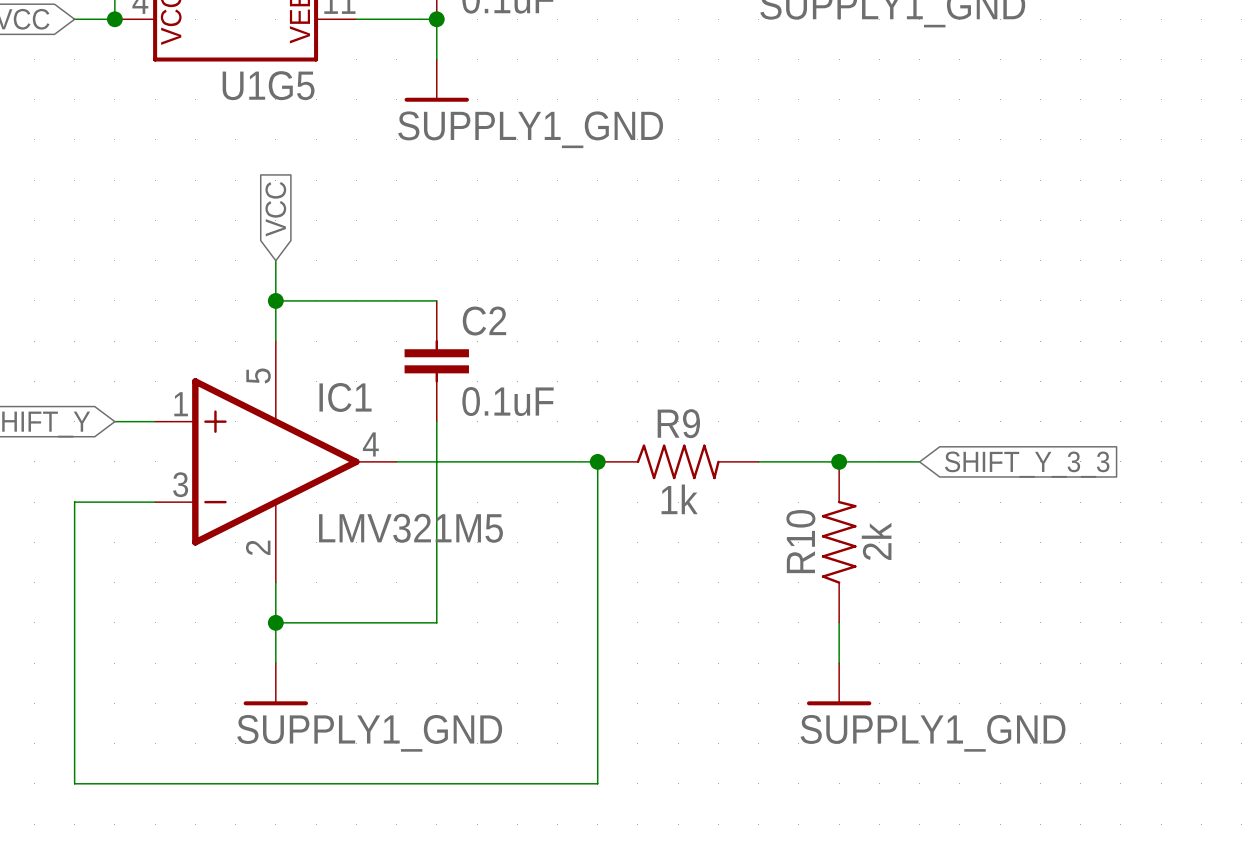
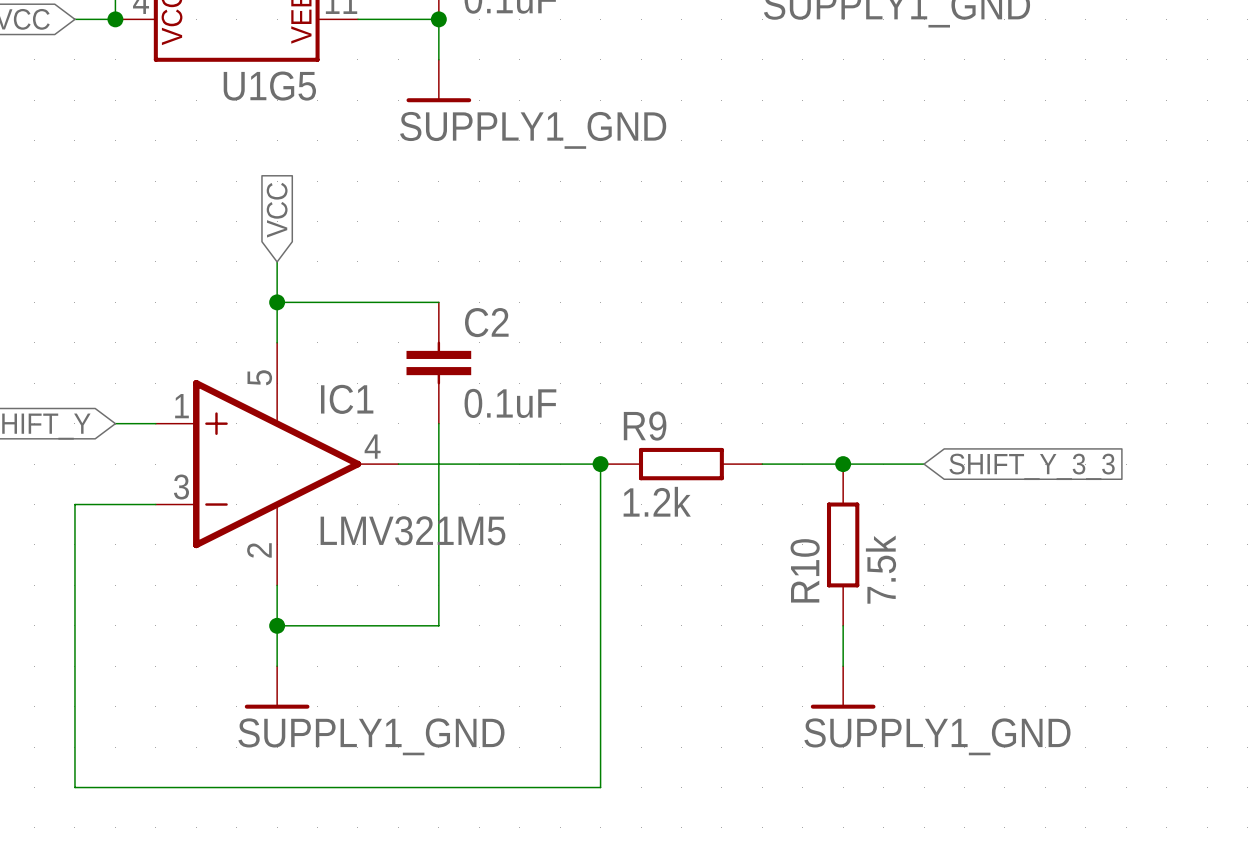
R9 name position: R9 (678, 423) -> R9 (645, 426)
R9 symbol: [597, 444, 759, 480] -> [600, 447, 763, 481]
R10 symbol: [821, 461, 857, 623] -> [826, 464, 860, 626]
R9 value: 1k (679, 499) -> 1.2k (657, 501)
R10 name position: R10 (800, 541) -> R10 (805, 570)
R10 value: 2k (876, 541) -> 7.5k (881, 569)

